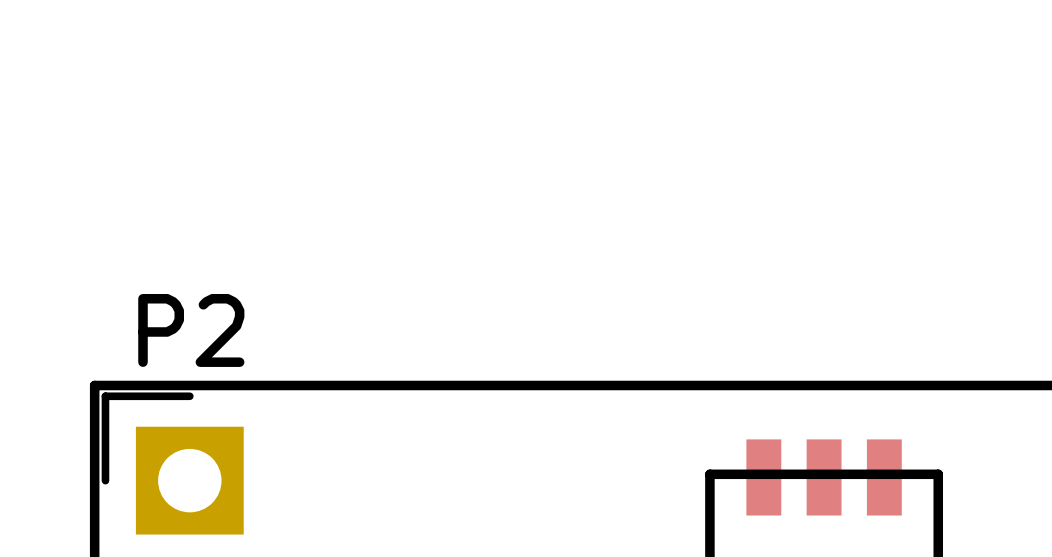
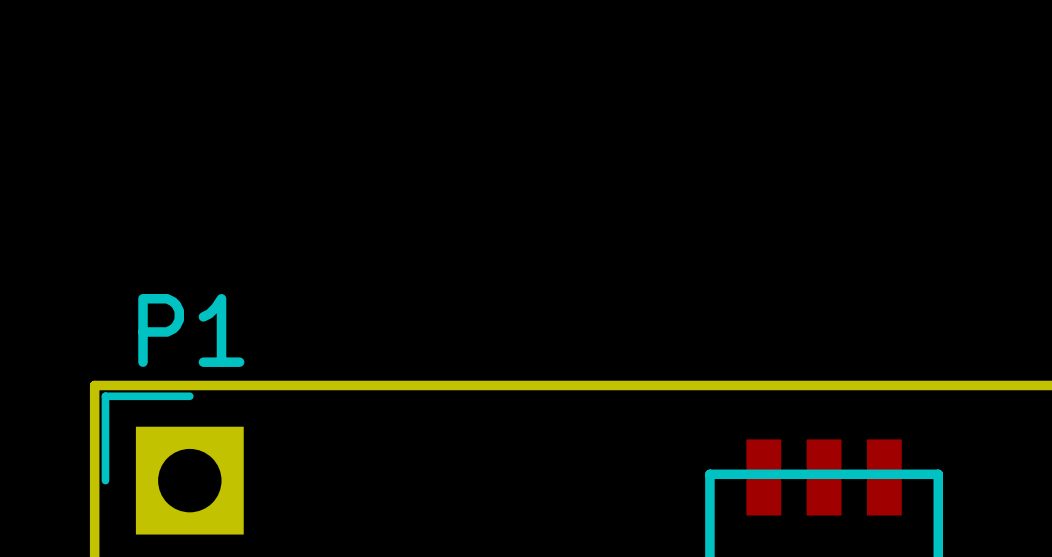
P2 name: P2 (191, 330) -> P1 (191, 330)

